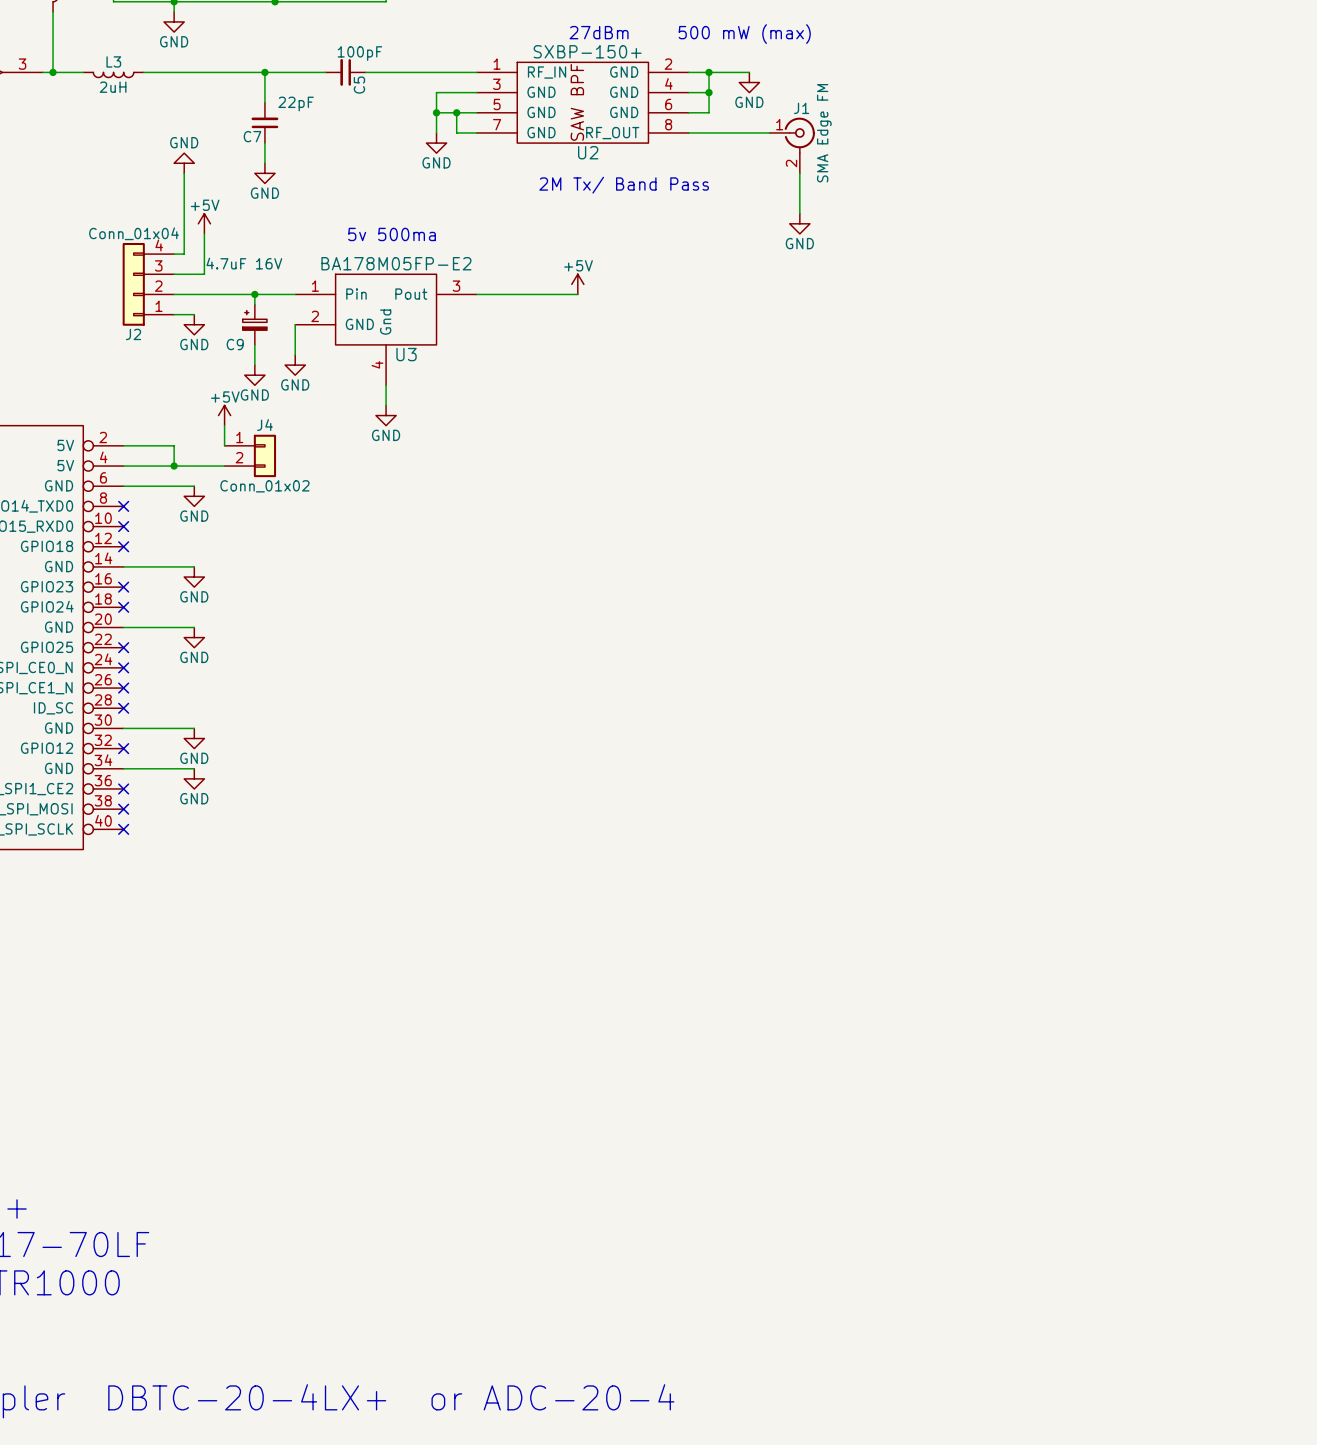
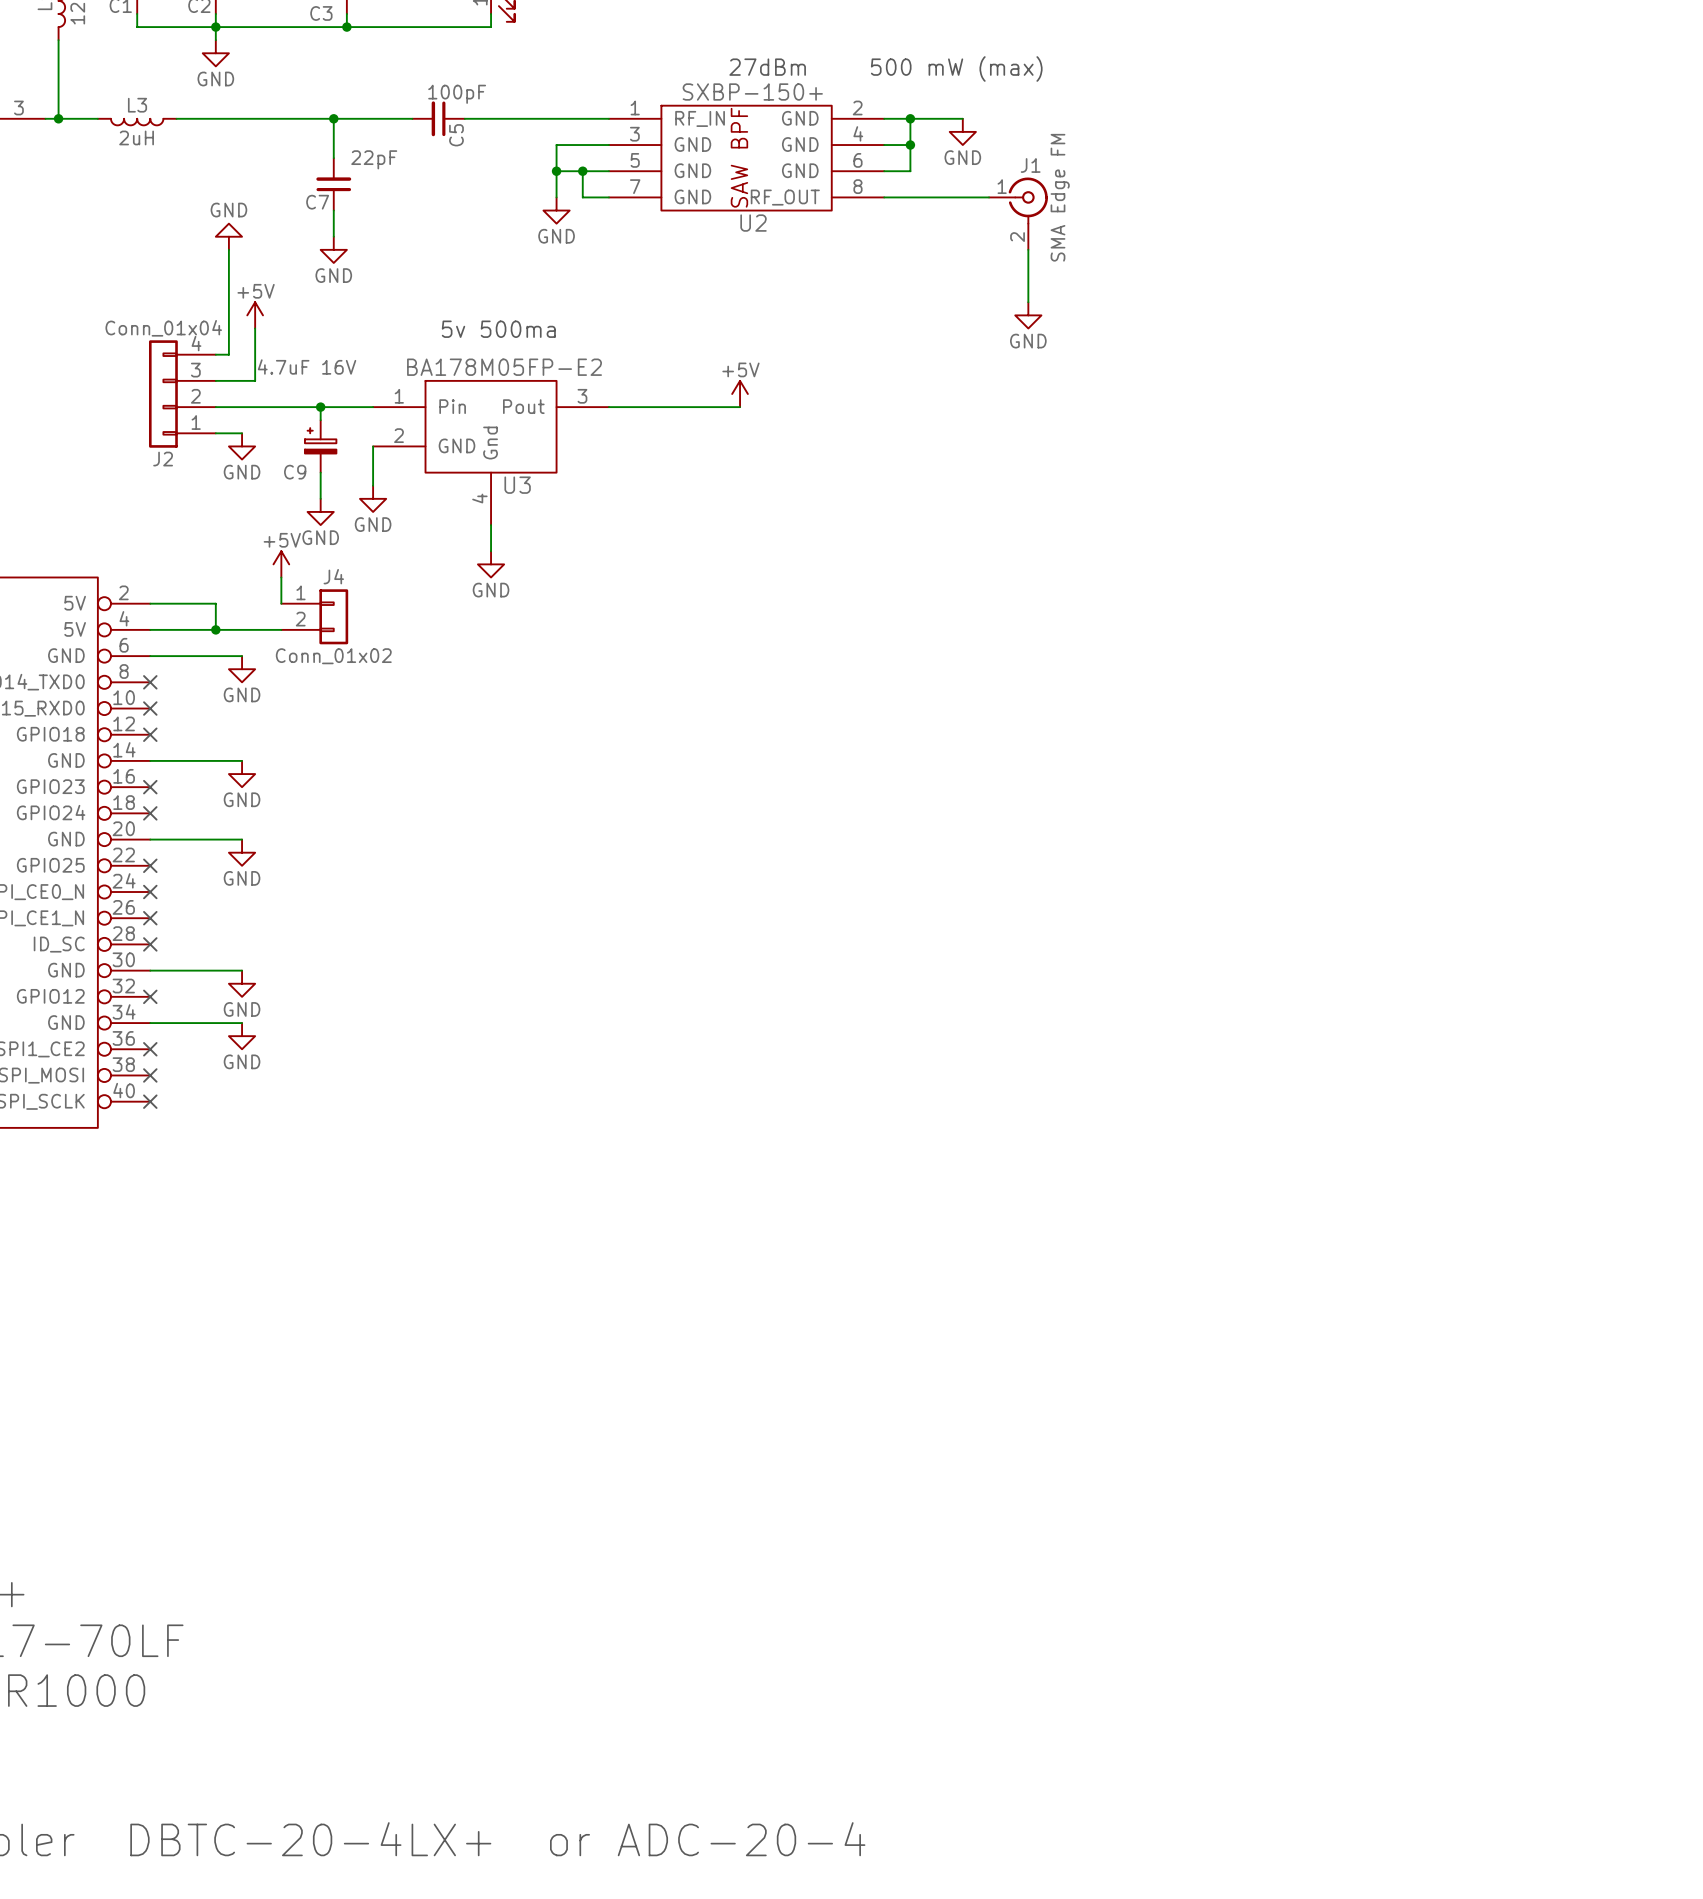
text: 2M Tx/ Band Pass (624, 185) -> none

